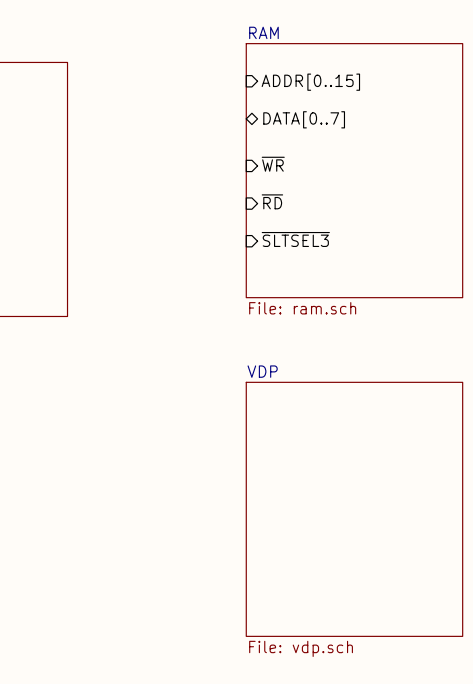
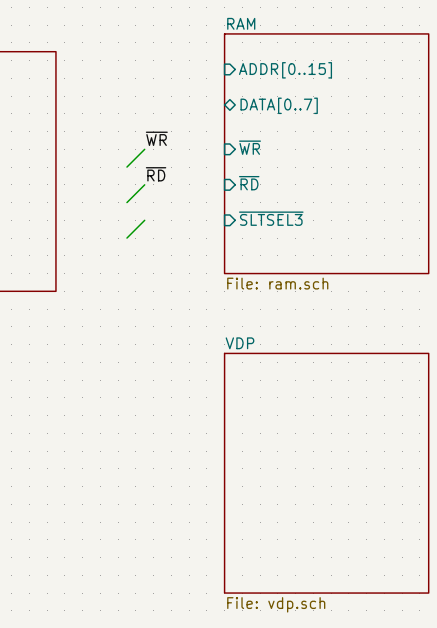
label: none -> ~{WR} (156, 138)
wire: none -> (144, 149) (126, 167)
label: none -> ~{RD} (156, 174)
wire: none -> (144, 184) (126, 202)
wire: none -> (144, 220) (126, 238)

